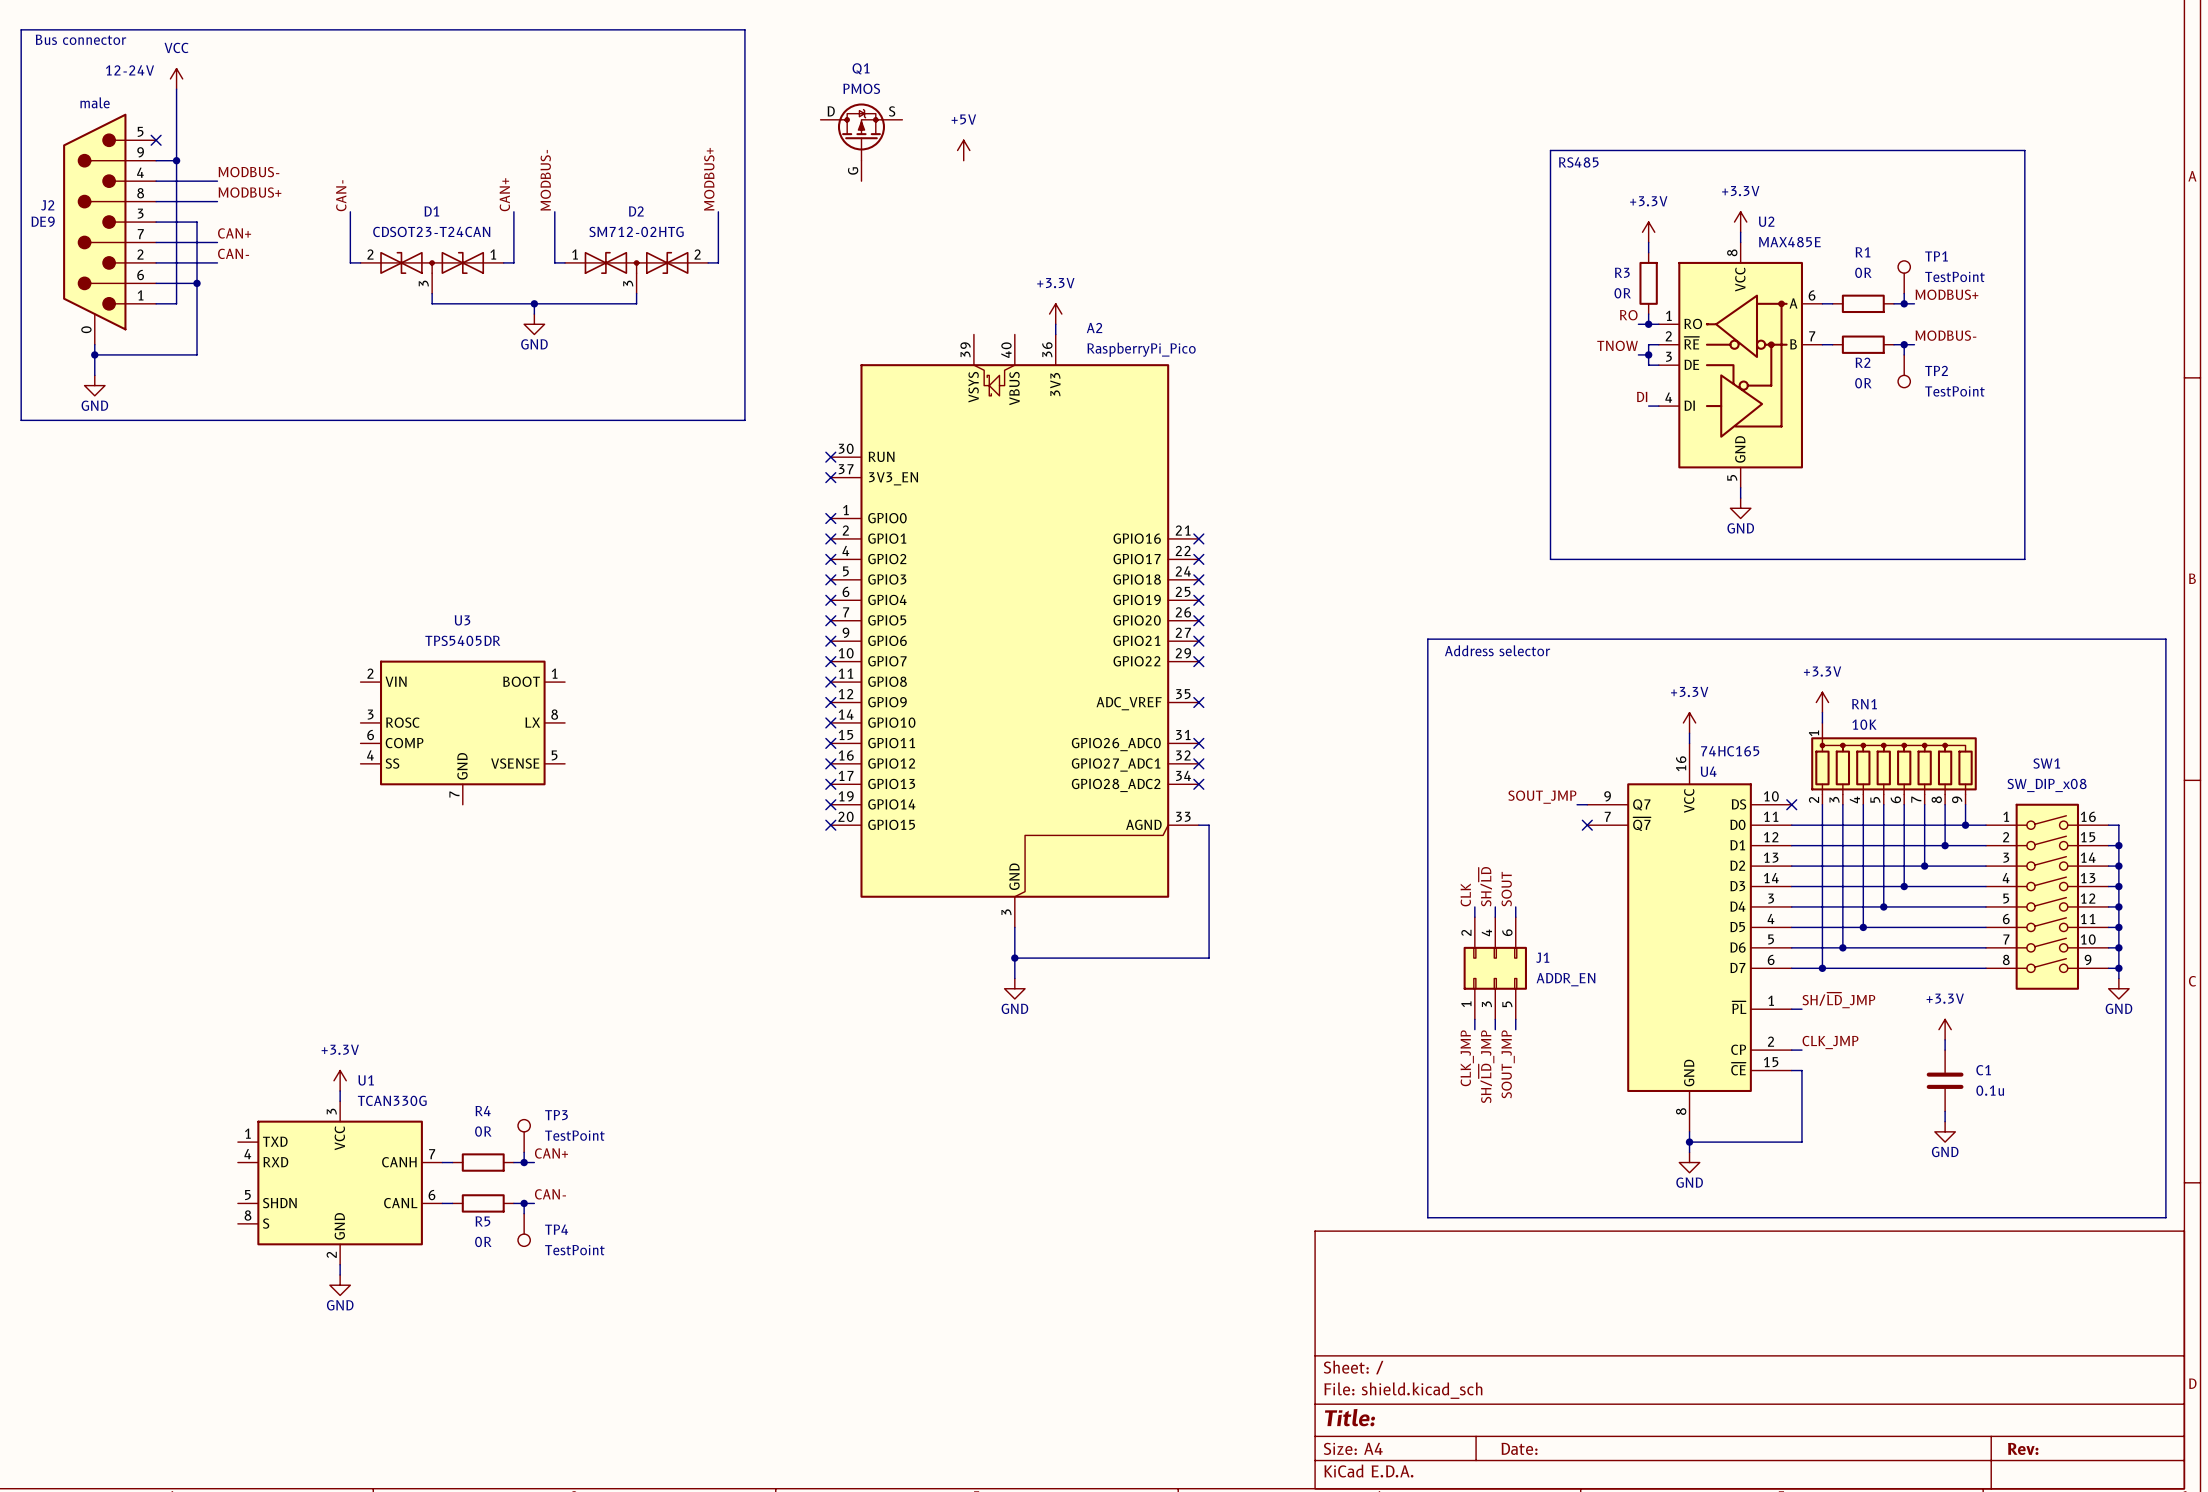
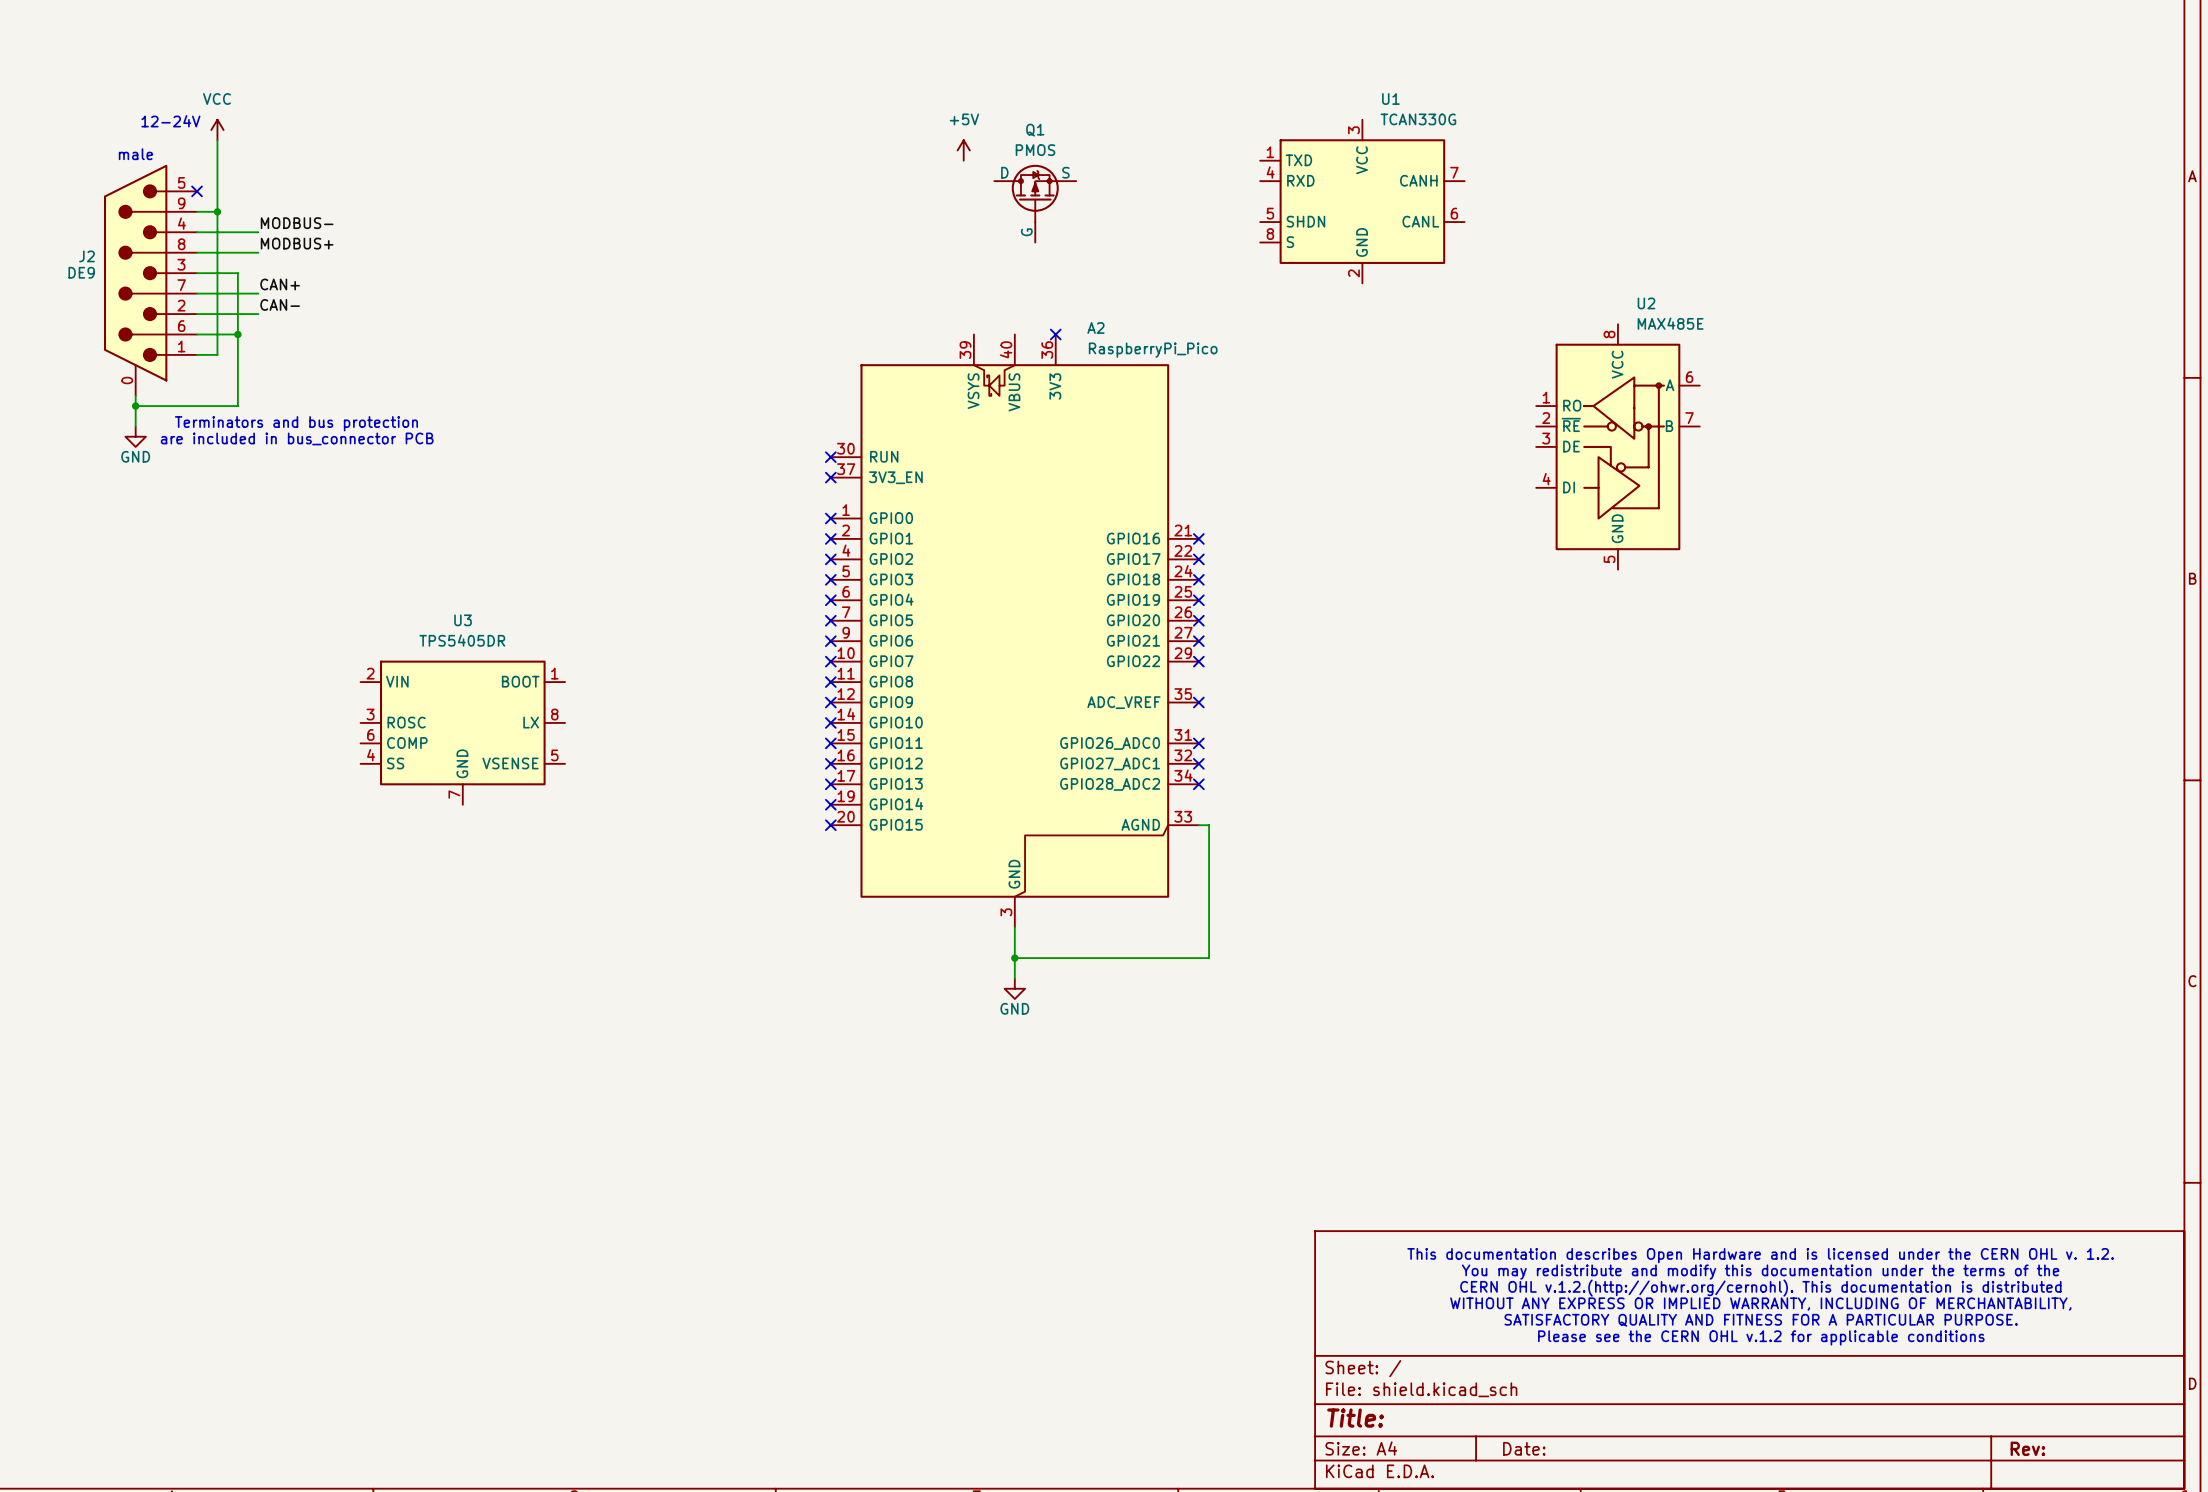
line: (21, 29) (744, 29) (744, 420) (21, 420) (21, 29) -> none
text: Bus connector (81, 39) -> none
text position: 12-24V (129, 70) -> 12-24V (170, 121)
power symbol position: VCC (176, 78) -> VCC (217, 130)
wire: (176, 89) (176, 303) (156, 303) -> (217, 140) (217, 354) (197, 354)
text position: male (95, 102) -> male (135, 154)
no-connect mark: (156, 140) -> none
Q1 position: (861, 142) -> (1035, 203)
line: (1550, 150) (2024, 150) (2024, 559) (1550, 559) (1550, 150) -> none
wire: (156, 160) (176, 160) -> (197, 211) (217, 211)
junction: (176, 160) -> none
text: RS485 (1578, 162) -> none
label position: MODBUS- (248, 172) -> MODBUS- (297, 223)
label: MODBUS+ (709, 179) -> none
label: MODBUS- (545, 180) -> none
wire: (156, 181) (217, 181) -> (197, 232) (258, 232)
no-connect mark: none -> (197, 191)
label position: MODBUS+ (249, 192) -> MODBUS+ (297, 243)
label: CAN+ (504, 194) -> none
label: CAN- (341, 195) -> none
wire: (156, 201) (217, 201) -> (197, 252) (258, 252)
junction: none -> (217, 211)
wire: (350, 211) (350, 262) (360, 262) -> none
wire: (513, 211) (513, 262) (503, 262) -> none
wire: (554, 211) (554, 262) (565, 262) -> none
wire: (718, 211) (718, 262) (708, 262) -> none
wire: (156, 222) (197, 222) (197, 354) (94, 354) -> (197, 273) (237, 273) (237, 406) (135, 406)
power symbol: +3.3V (1740, 222) -> none
J2 position: (109, 229) -> (150, 280)
power symbol: +3.3V (1648, 232) -> none
wire: (1740, 232) (1740, 242) -> none
label position: CAN+ (234, 233) -> CAN+ (280, 284)
wire: (156, 242) (217, 242) -> (197, 293) (258, 293)
wire: (1648, 242) (1648, 252) -> none
label position: CAN- (233, 253) -> CAN- (280, 304)
wire: (156, 262) (217, 262) -> (197, 314) (258, 314)
D1: CDSOT23-T24CAN (432, 272) -> none
D2: SM712-02HTG (636, 272) -> none
TP1: TestPoint (1904, 277) -> none
wire: (156, 283) (197, 283) -> (197, 334) (237, 334)
junction: (197, 283) -> none
R3: 0R (1648, 283) -> none
wire: (432, 293) (432, 303) (636, 303) (636, 293) -> none
wire: (1904, 293) (1904, 303) -> none
label: MODBUS+ (1946, 294) -> none
wire: (534, 303) (534, 314) -> none
junction: (534, 303) -> none
wire: (1822, 303) (1832, 303) -> none
R1: 0R (1863, 303) -> none
wire: (1893, 303) (1914, 303) -> none
junction: (1904, 303) -> none
power symbol: +3.3V (1055, 314) -> none
wire: (1648, 314) (1648, 324) -> none
label: RO (1628, 315) -> none
power symbol: GND (534, 324) -> none
wire: (1055, 324) (1055, 334) -> none
wire: (1638, 324) (1658, 324) -> none
junction: (1648, 324) -> none
junction: none -> (237, 334)
no-connect mark: none -> (1055, 334)
label: MODBUS- (1945, 335) -> none
wire: (94, 344) (94, 375) -> (135, 395) (135, 426)
wire: (1822, 344) (1832, 344) -> none
R2: 0R (1863, 344) -> none
wire: (1893, 344) (1914, 344) -> none
wire: (1904, 344) (1904, 354) -> none
junction: (1904, 344) -> none
label: TNOW (1617, 345) -> none
junction: (94, 354) -> none
junction: (1648, 354) -> none
U2 position: (1740, 365) -> (1617, 446)
TP2: TestPoint (1904, 371) -> none
power symbol position: GND (94, 385) -> GND (135, 436)
label: DI (1642, 396) -> none
junction: none -> (135, 406)
text: none -> Terminators and bus protection (296, 423)
text: none -> are included in bus_connector PCB (297, 438)
wire: (1740, 487) (1740, 498) -> none
power symbol: GND (1740, 508) -> none
line: (1427, 639) (2165, 639) (2165, 1217) (1427, 1217) (1427, 639) -> none
text: Address selector (1497, 650) -> none
power symbol: +3.3V (1822, 702) -> none
wire: (1822, 712) (1822, 722) -> none
power symbol: +3.3V (1689, 722) -> none
wire: (1689, 733) (1689, 743) -> none
RN1: 10K (1893, 763) -> none
label: SOUT_JMP (1542, 797) -> none
wire: (1577, 804) (1587, 804) -> none
no-connect mark: (1791, 804) -> none
wire: (1822, 804) (1822, 968) -> none
wire: (1842, 804) (1842, 947) -> none
wire: (1863, 804) (1863, 927) -> none
wire: (1883, 804) (1883, 906) -> none
wire: (1904, 804) (1904, 886) -> none
wire: (1924, 804) (1924, 866) -> none
wire: (1945, 804) (1945, 845) -> none
wire: (1965, 804) (1965, 825) -> none
no-connect mark: (1587, 825) -> none
wire: (1791, 825) (1985, 825) -> none
junction: (1965, 825) -> none
wire: (2108, 825) (2118, 825) (2118, 978) -> none
wire: (1791, 845) (1985, 845) -> none
junction: (1945, 845) -> none
wire: (2108, 845) (2118, 845) -> none
junction: (2118, 845) -> none
wire: (1791, 866) (1985, 866) -> none
junction: (1924, 866) -> none
wire: (2108, 866) (2118, 866) -> none
junction: (2118, 866) -> none
label: SH/~{LD} (1485, 886) -> none
wire: (1791, 886) (1985, 886) -> none
junction: (1904, 886) -> none
wire: (2108, 886) (2118, 886) -> none
junction: (2118, 886) -> none
label: SOUT (1506, 889) -> none
label: CLK (1465, 894) -> none
SW1: SW_DIP_x08 (2047, 896) -> none
wire: (1474, 906) (1474, 917) -> none
wire: (1495, 906) (1495, 917) -> none
wire: (1515, 906) (1515, 917) -> none
wire: (1791, 906) (1985, 906) -> none
junction: (1883, 906) -> none
wire: (2108, 906) (2118, 906) -> none
junction: (2118, 906) -> none
wire: (1791, 927) (1985, 927) -> none
junction: (1863, 927) -> none
wire: (2108, 927) (2118, 927) -> none
junction: (2118, 927) -> none
U4: 74HC165 (1689, 937) -> none
wire: (1791, 947) (1985, 947) -> none
junction: (1842, 947) -> none
wire: (2108, 947) (2118, 947) -> none
junction: (2118, 947) -> none
J1: ADDR_EN (1495, 968) -> none
wire: (1791, 968) (1985, 968) -> none
junction: (1822, 968) -> none
wire: (2108, 968) (2118, 968) -> none
junction: (2118, 968) -> none
power symbol: GND (2118, 988) -> none
label: SH/~{LD}_JMP (1838, 1000) -> none
wire: (1791, 1009) (1801, 1009) -> none
wire: (1474, 1019) (1474, 1029) -> none
wire: (1495, 1019) (1495, 1029) -> none
wire: (1515, 1019) (1515, 1029) -> none
power symbol: +3.3V (1945, 1029) -> none
wire: (1945, 1039) (1945, 1050) -> none
label: CLK_JMP (1830, 1042) -> none
wire: (1791, 1050) (1801, 1050) -> none
label: CLK_JMP (1467, 1058) -> none
label: SOUT_JMP (1508, 1064) -> none
label: SH/~{LD}_JMP (1486, 1066) -> none
wire: (1791, 1070) (1801, 1070) (1801, 1142) (1689, 1142) -> none
power symbol: +3.3V (340, 1080) -> none
C1: 0.1u (1945, 1080) -> none
wire: (340, 1090) (340, 1101) -> none
wire: (1945, 1111) (1945, 1121) -> none
wire: (1689, 1131) (1689, 1152) -> none
power symbol: GND (1945, 1131) -> none
TP3: TestPoint (524, 1135) -> none
junction: (1689, 1142) -> none
wire: (524, 1152) (524, 1162) -> none
label: CAN+ (551, 1153) -> none
wire: (442, 1162) (452, 1162) -> none
R4: 0R (483, 1162) -> none
wire: (513, 1162) (534, 1162) -> none
junction: (524, 1162) -> none
power symbol: GND (1689, 1162) -> none
U1 position: (340, 1182) -> (1362, 201)
label: CAN- (550, 1194) -> none
wire: (442, 1203) (452, 1203) -> none
R5: 0R (483, 1203) -> none
wire: (513, 1203) (534, 1203) -> none
wire: (524, 1203) (524, 1213) -> none
junction: (524, 1203) -> none
TP4: TestPoint (524, 1230) -> none
text: none -> This documentation describes Open Hardware and is licensed under the CERN OHL v. 1.2. (1760, 1255)
wire: (340, 1264) (340, 1274) -> none
text: none -> You may redistribute and modify this documentation under the terms of the (1760, 1272)
power symbol: GND (340, 1285) -> none
text: none -> CERN OHL v.1.2.(http://ohwr.org/cernohl). This documentation is distributed (1760, 1288)
text: none -> WITHOUT ANY EXPRESS OR IMPLIED WARRANTY, INCLUDING OF MERCHANTABILITY, (1760, 1304)
text: none -> SATISFACTORY QUALITY AND FITNESS FOR A PARTICULAR PURPOSE. (1761, 1320)
text: none -> Please see the CERN OHL v.1.2 for applicable conditions (1761, 1337)

